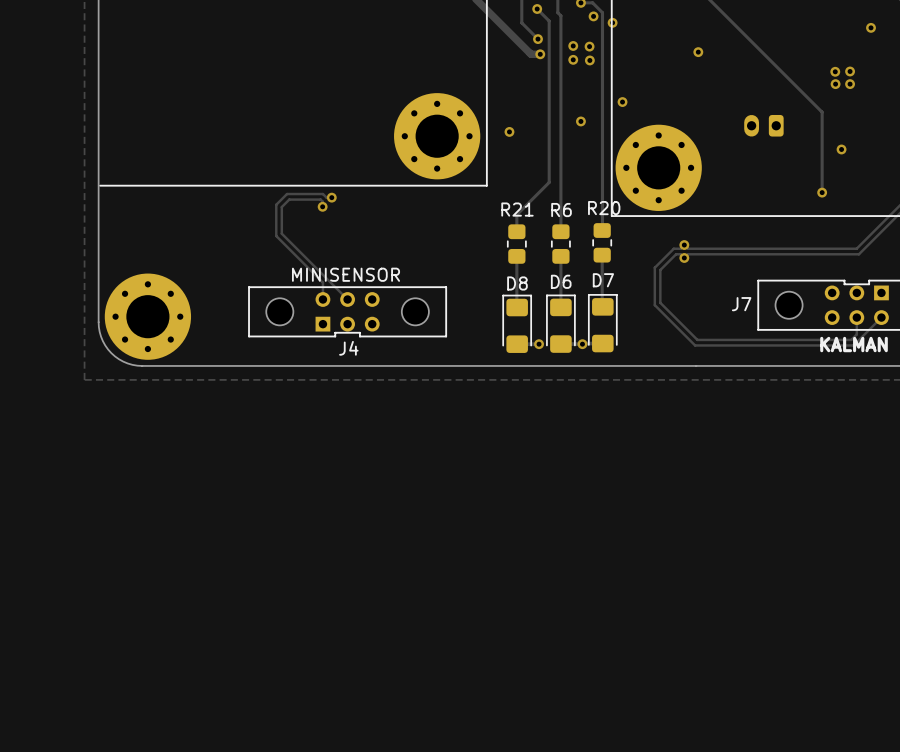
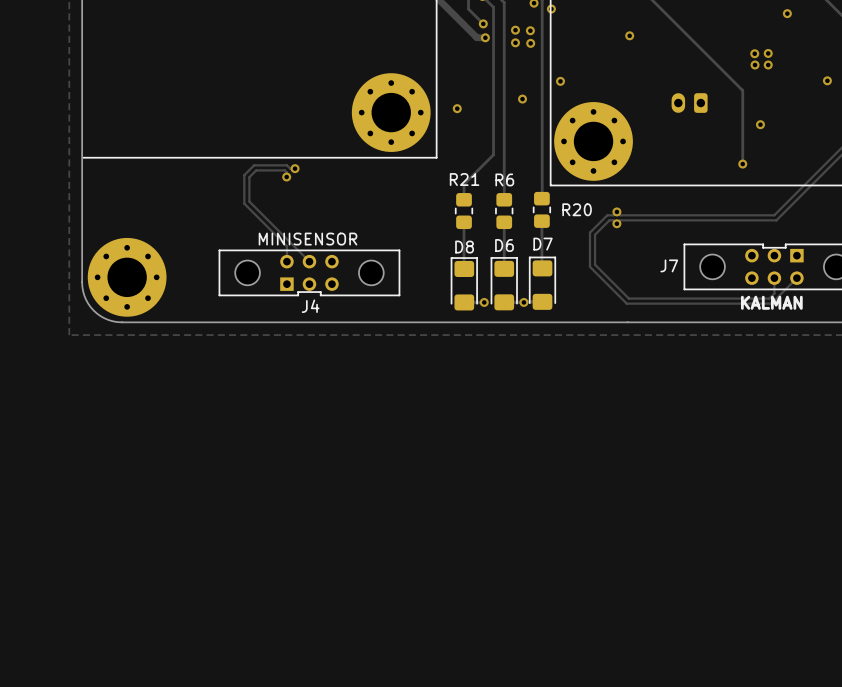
R20 name position: R20 (604, 208) -> R20 (577, 209)

